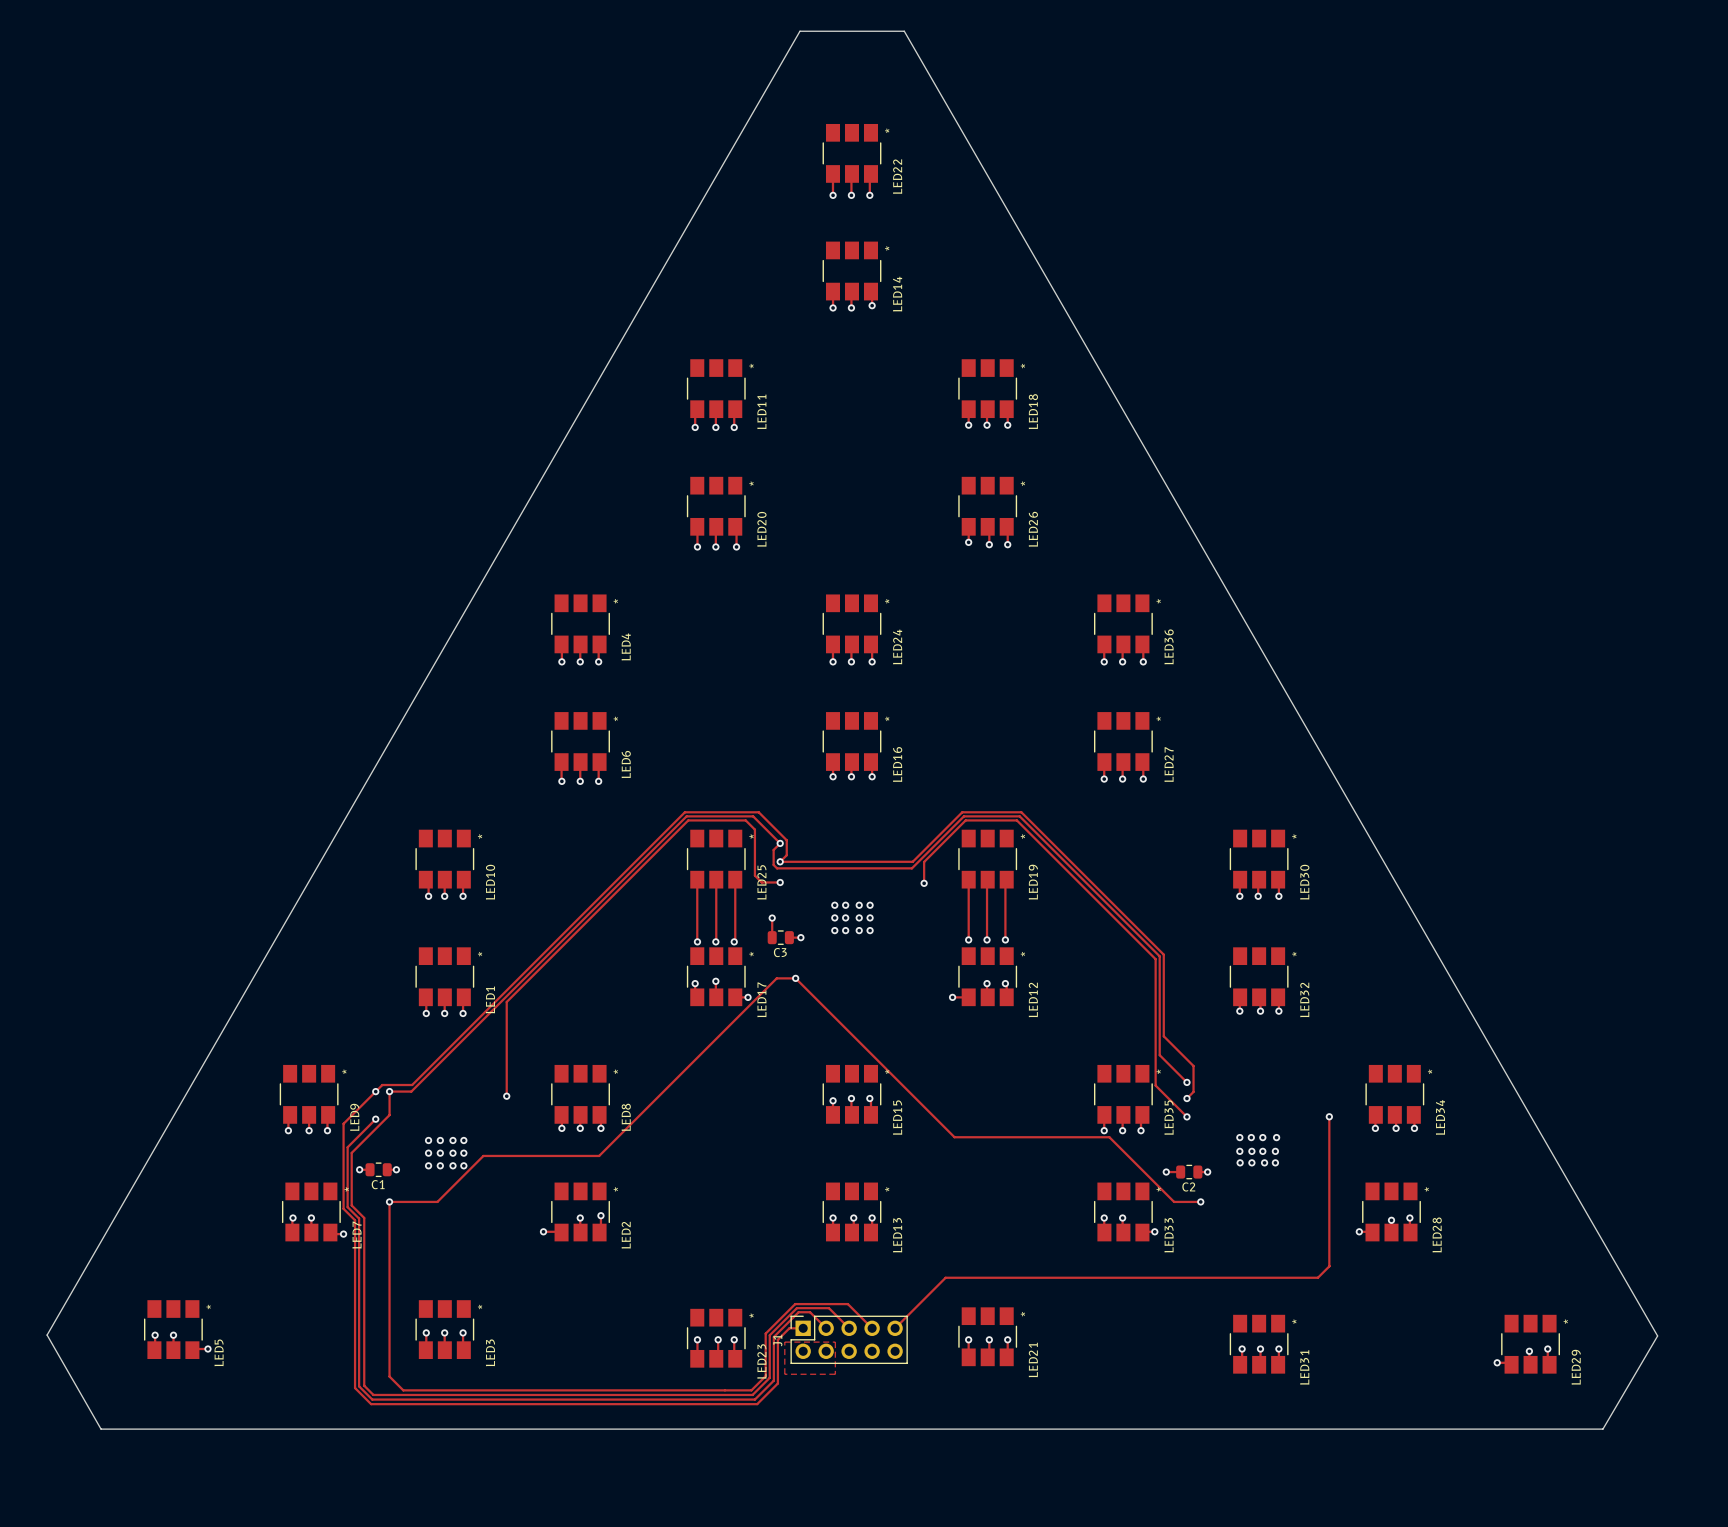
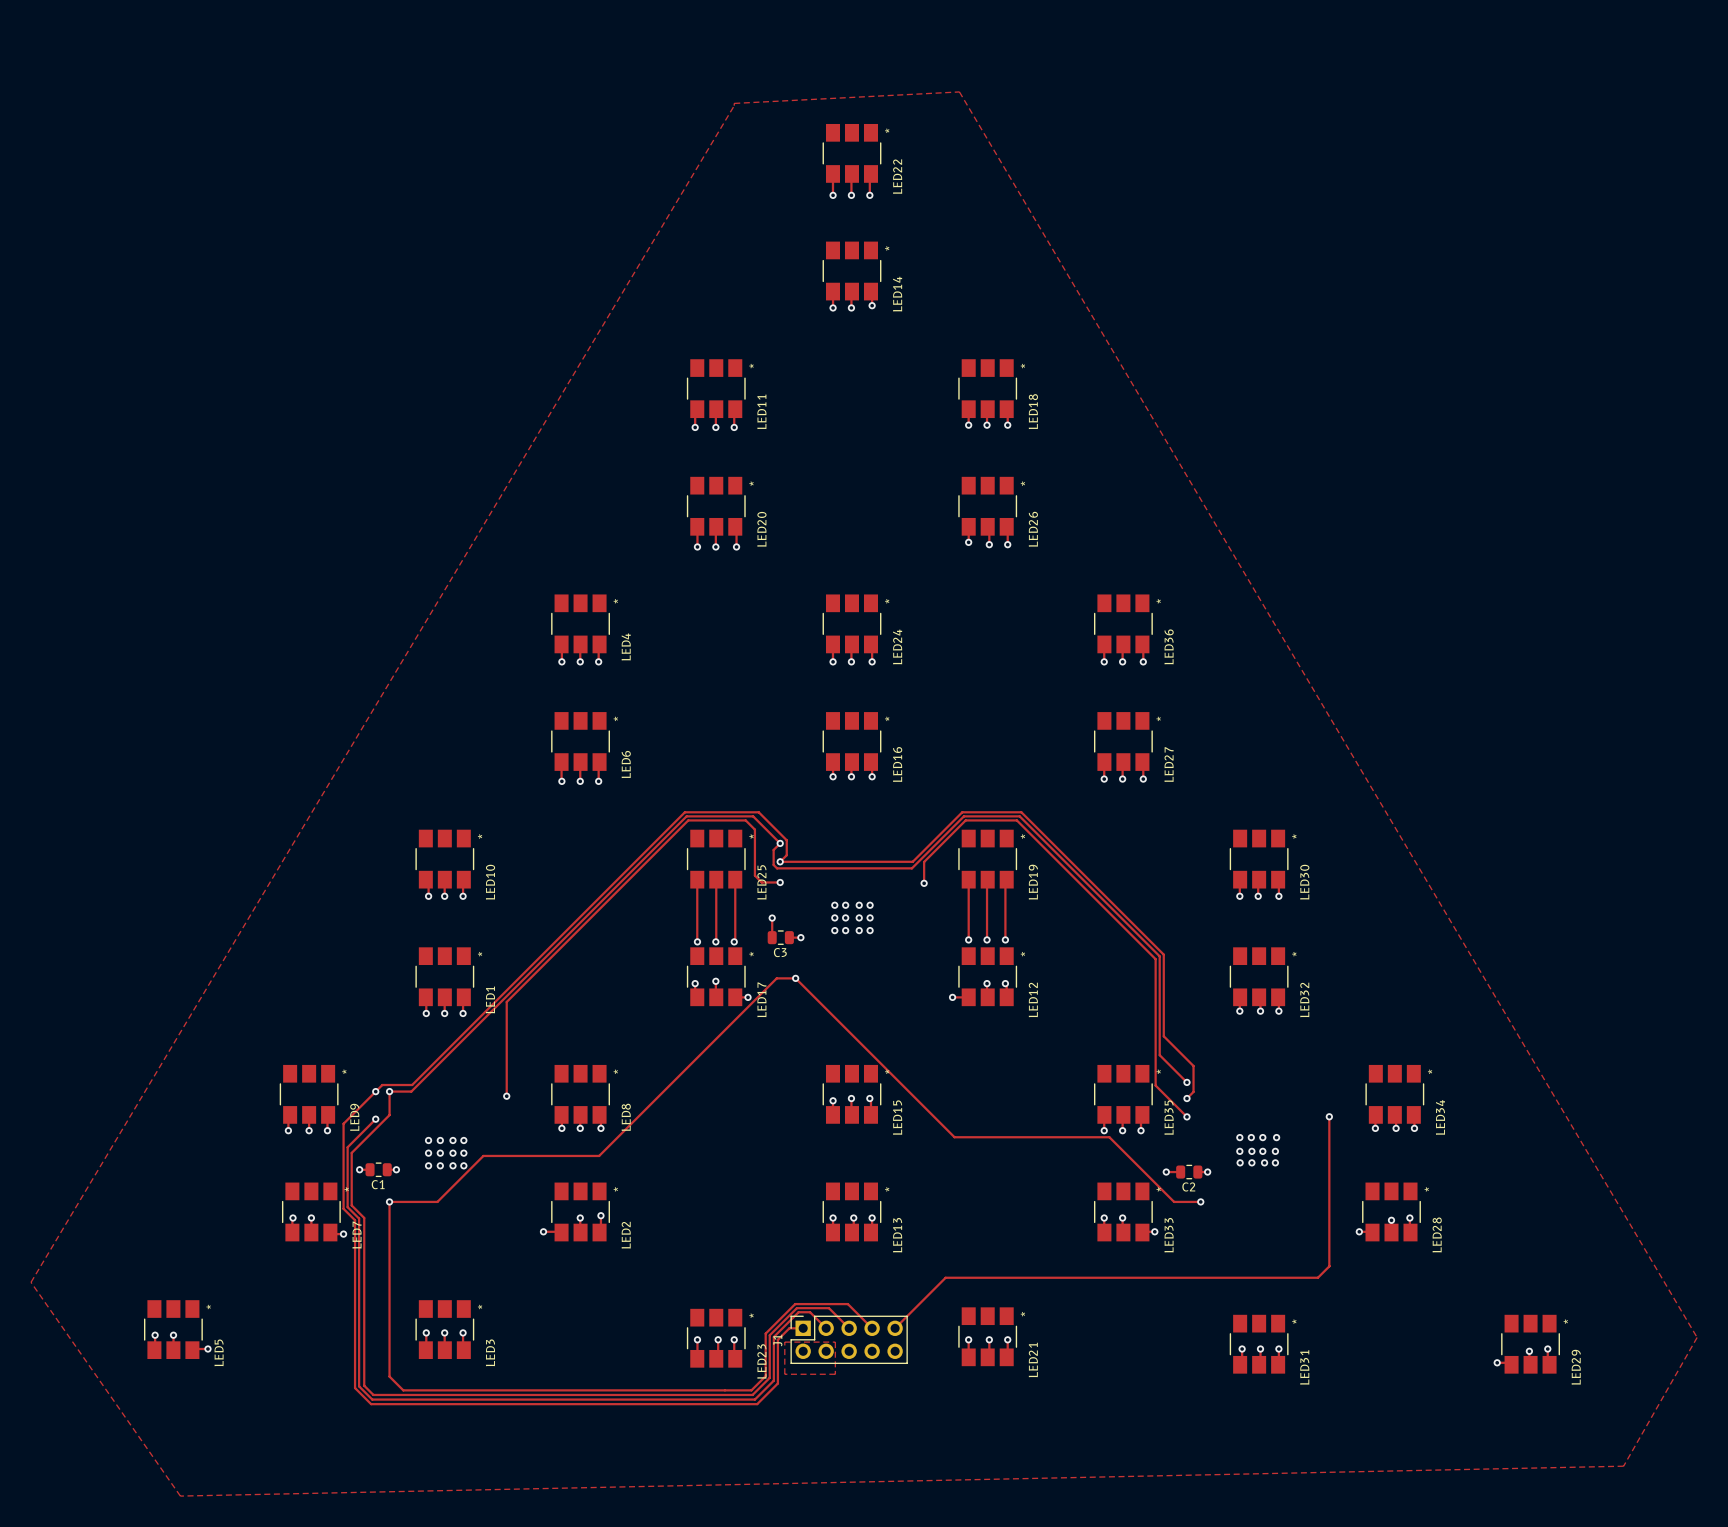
board edge: (799, 31) (904, 31) (1657, 1335) (1602, 1429) (101, 1429) (47, 1335) (799, 31) -> none
zone outline: none -> (959, 91) (734, 103) (31, 1282) (180, 1496) (1623, 1466) (1697, 1337) (959, 91)

